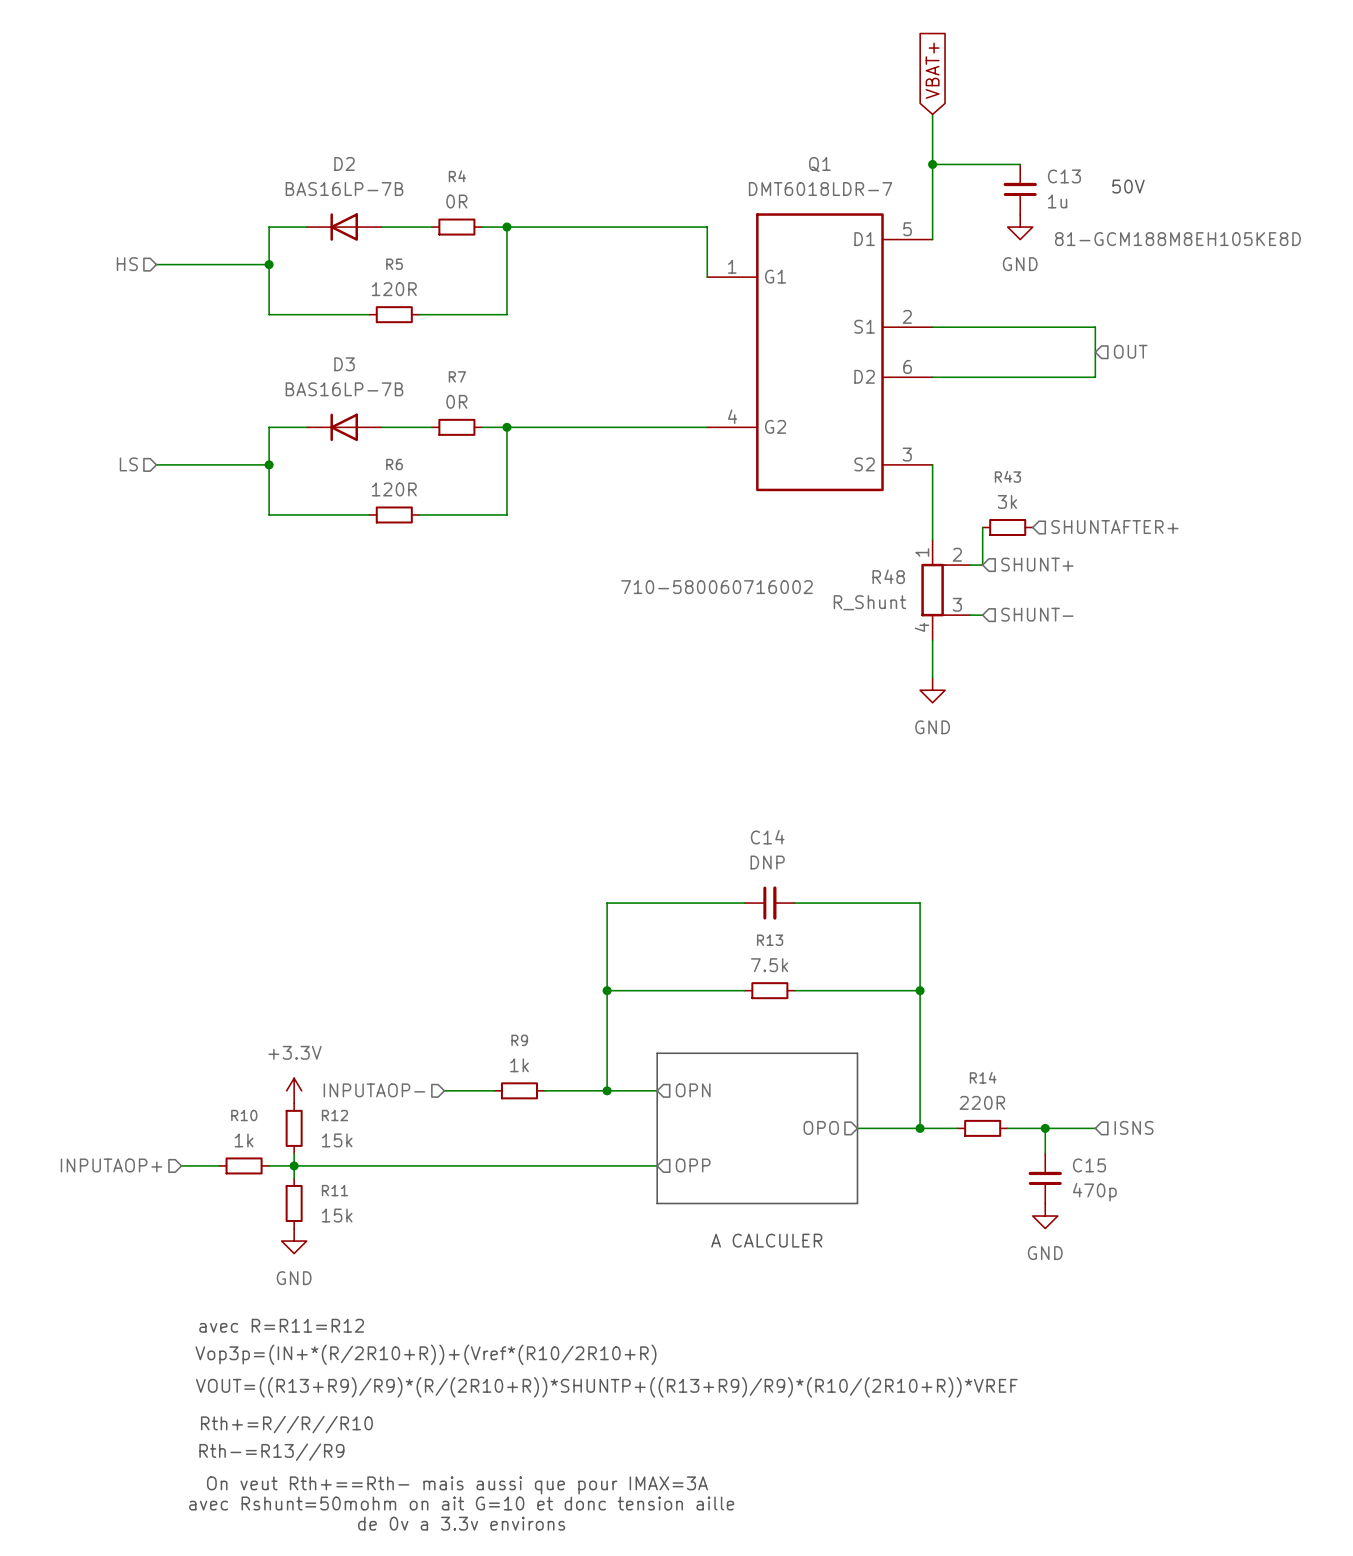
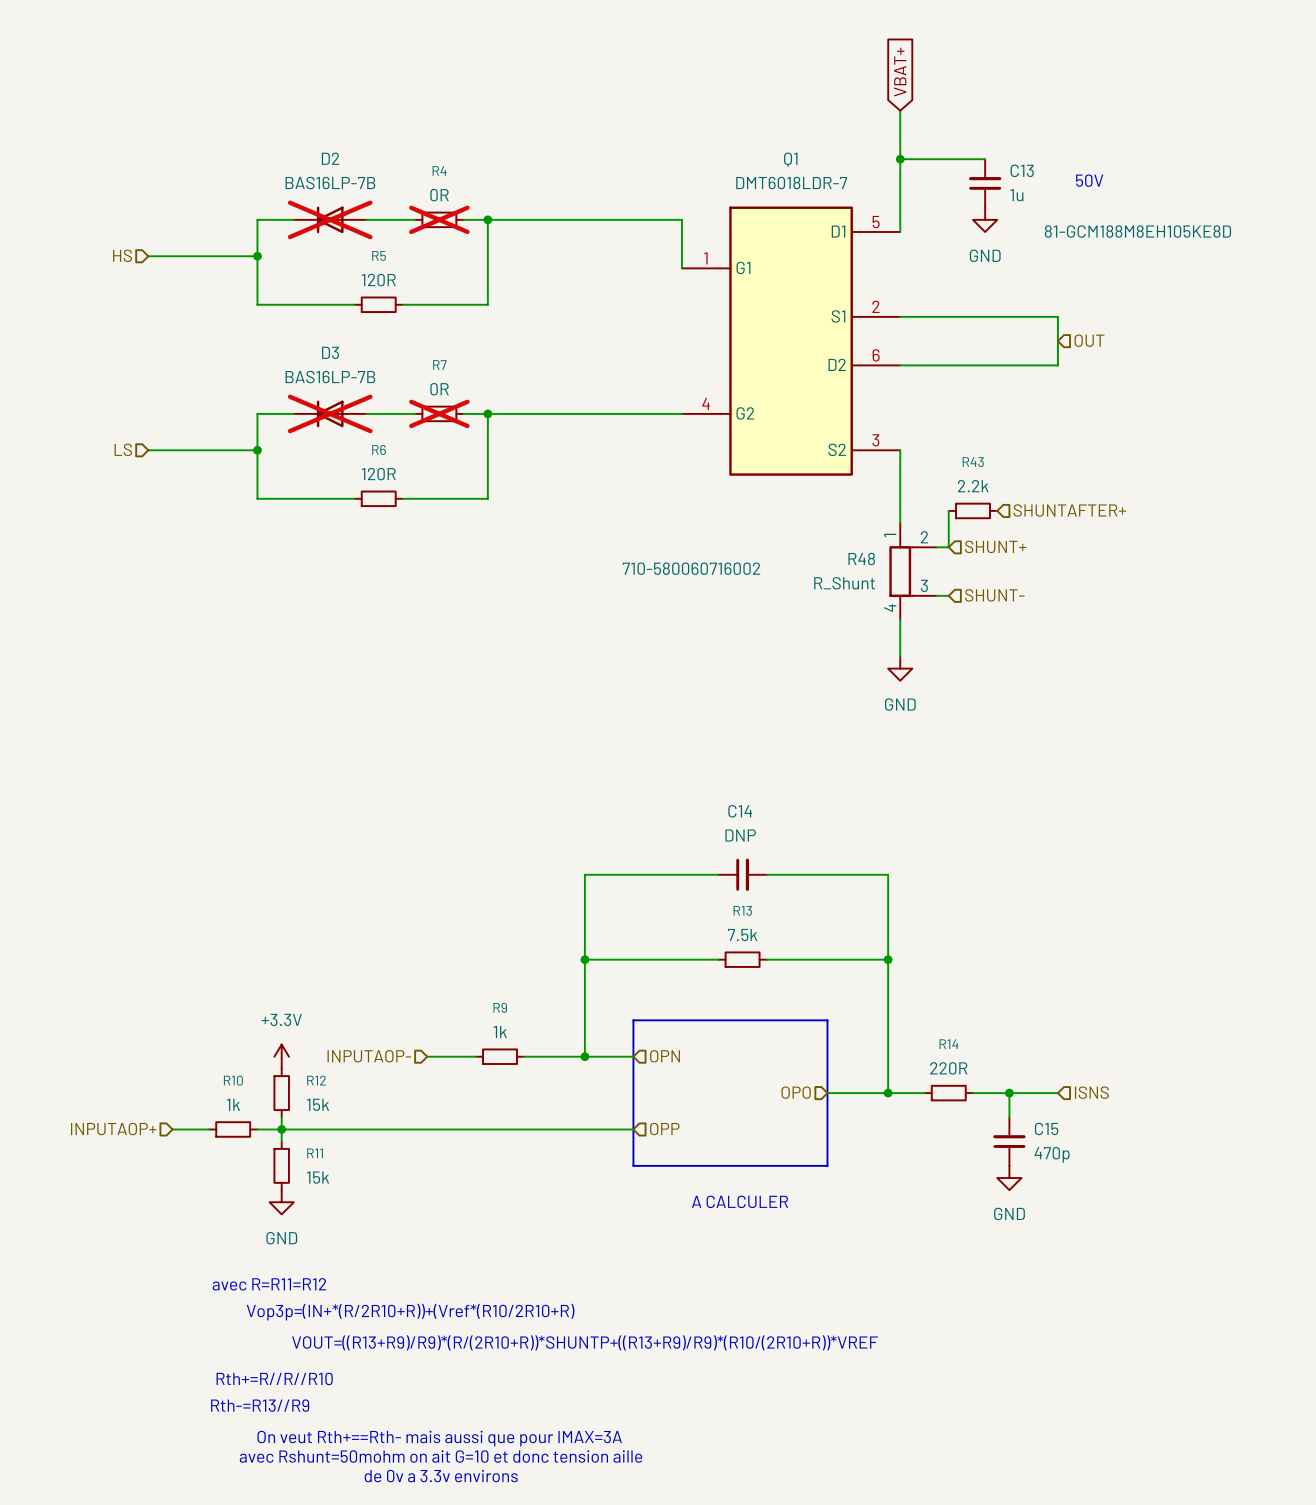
D2 do-not-place cross: none -> (330, 219)
R4 do-not-place cross: none -> (439, 219)
D3 do-not-place cross: none -> (330, 413)
R7 do-not-place cross: none -> (439, 413)
R43 value: 3k (1007, 501) -> 2.2k (973, 486)

